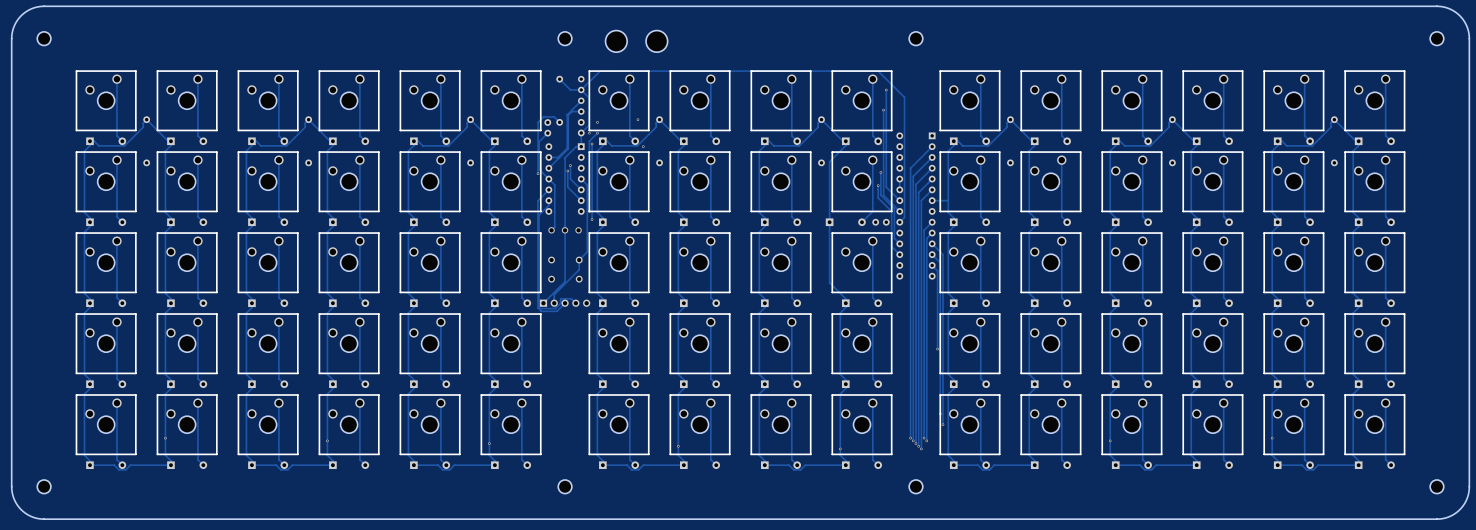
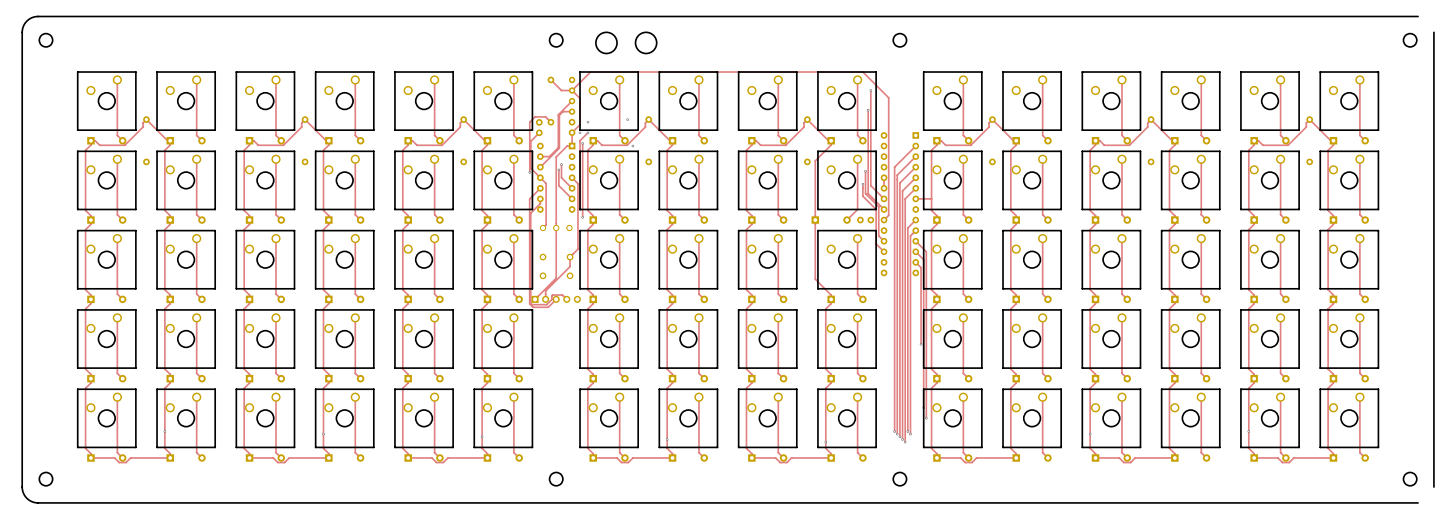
board edge: (44, 6) (1436, 6) (1448, 8) (1463, 20) (1469, 38) (1469, 486) (1467, 497) (1455, 513) (1436, 519) (44, 519) (33, 517) (19, 507) (11, 489) (11, 38) (13, 27) (21, 15) (33, 8) (44, 6) -> none
board edge: none -> (1418, 16) (38, 16) (26, 21) (22, 32) (22, 487) (25, 496) (33, 502) (1418, 502)
board edge: none -> (1433, 32) (1433, 487)

